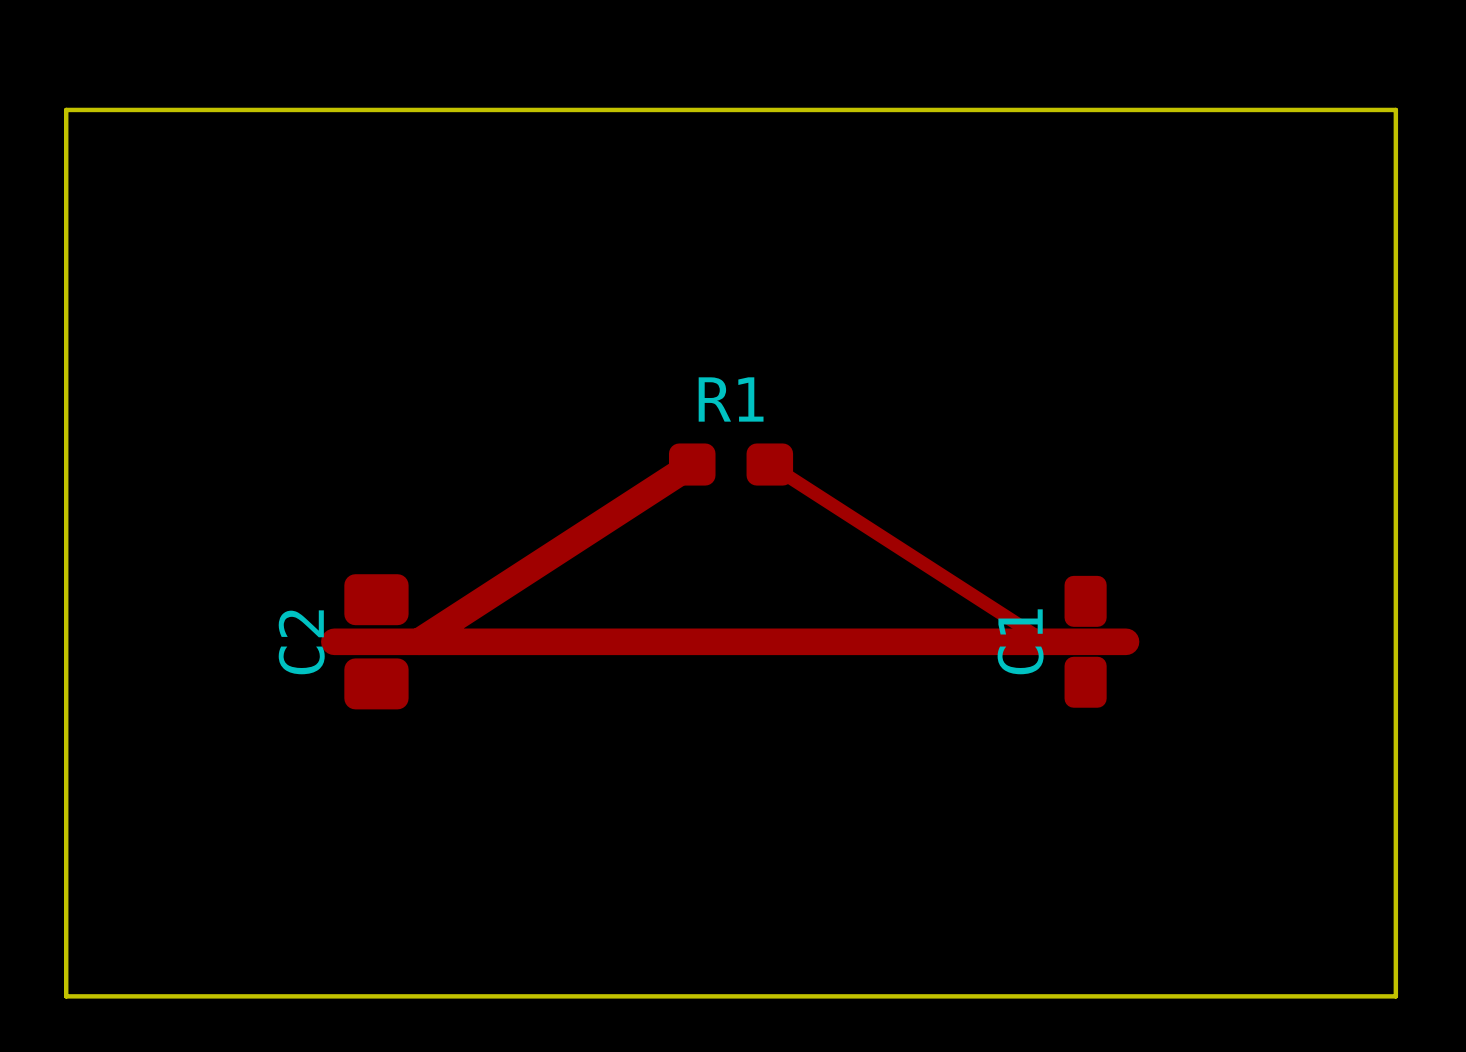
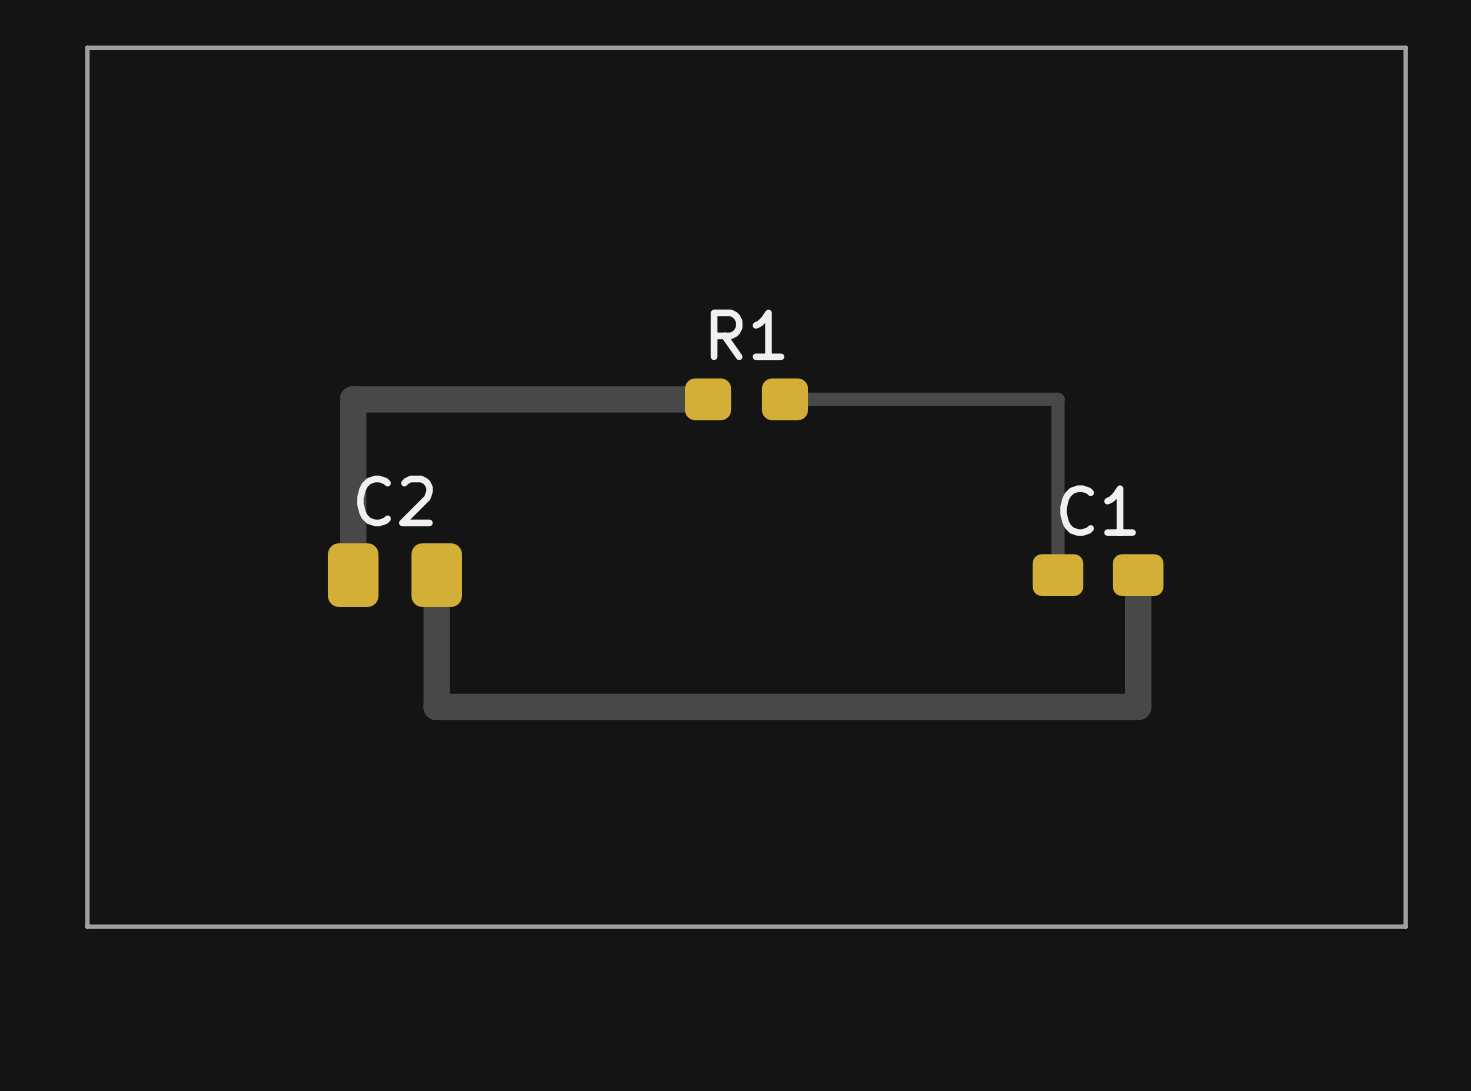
track: (692, 464) (418, 641) -> (708, 399) (353, 399) (353, 575)
track: (769, 464) (1045, 641) -> (784, 399) (1057, 399) (1057, 575)
track: (334, 641) (1126, 641) -> (436, 575) (436, 706) (1138, 706) (1138, 575)
C2 rotation: 0° (376, 641) -> 90° clockwise (394, 575)
C1 rotation: 0° (1085, 641) -> 90° clockwise (1098, 575)

